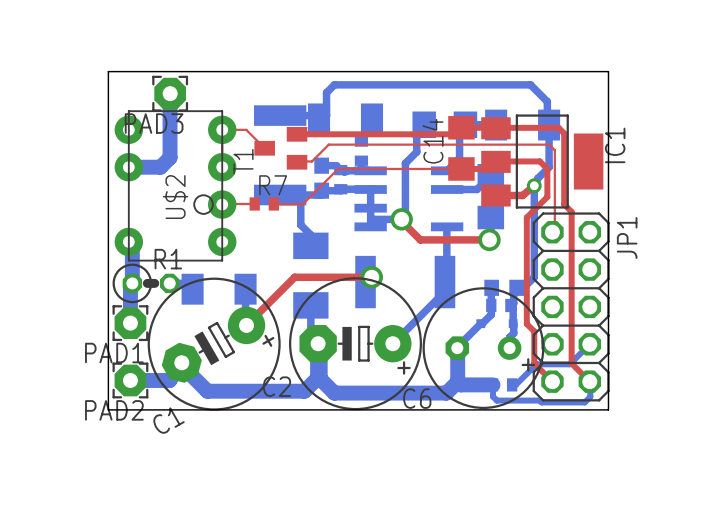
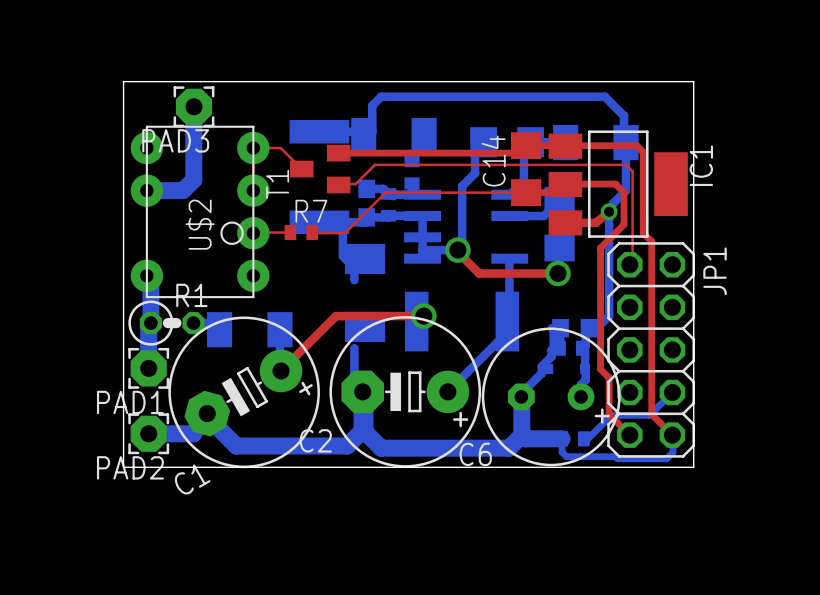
part position: (310, 275) -> (365, 292)
bottom track: (491, 305) (491, 314) (457, 345) -> (552, 328) (553, 329) (553, 348) (551, 350) (551, 356) (541, 366) (541, 373) (521, 393)

